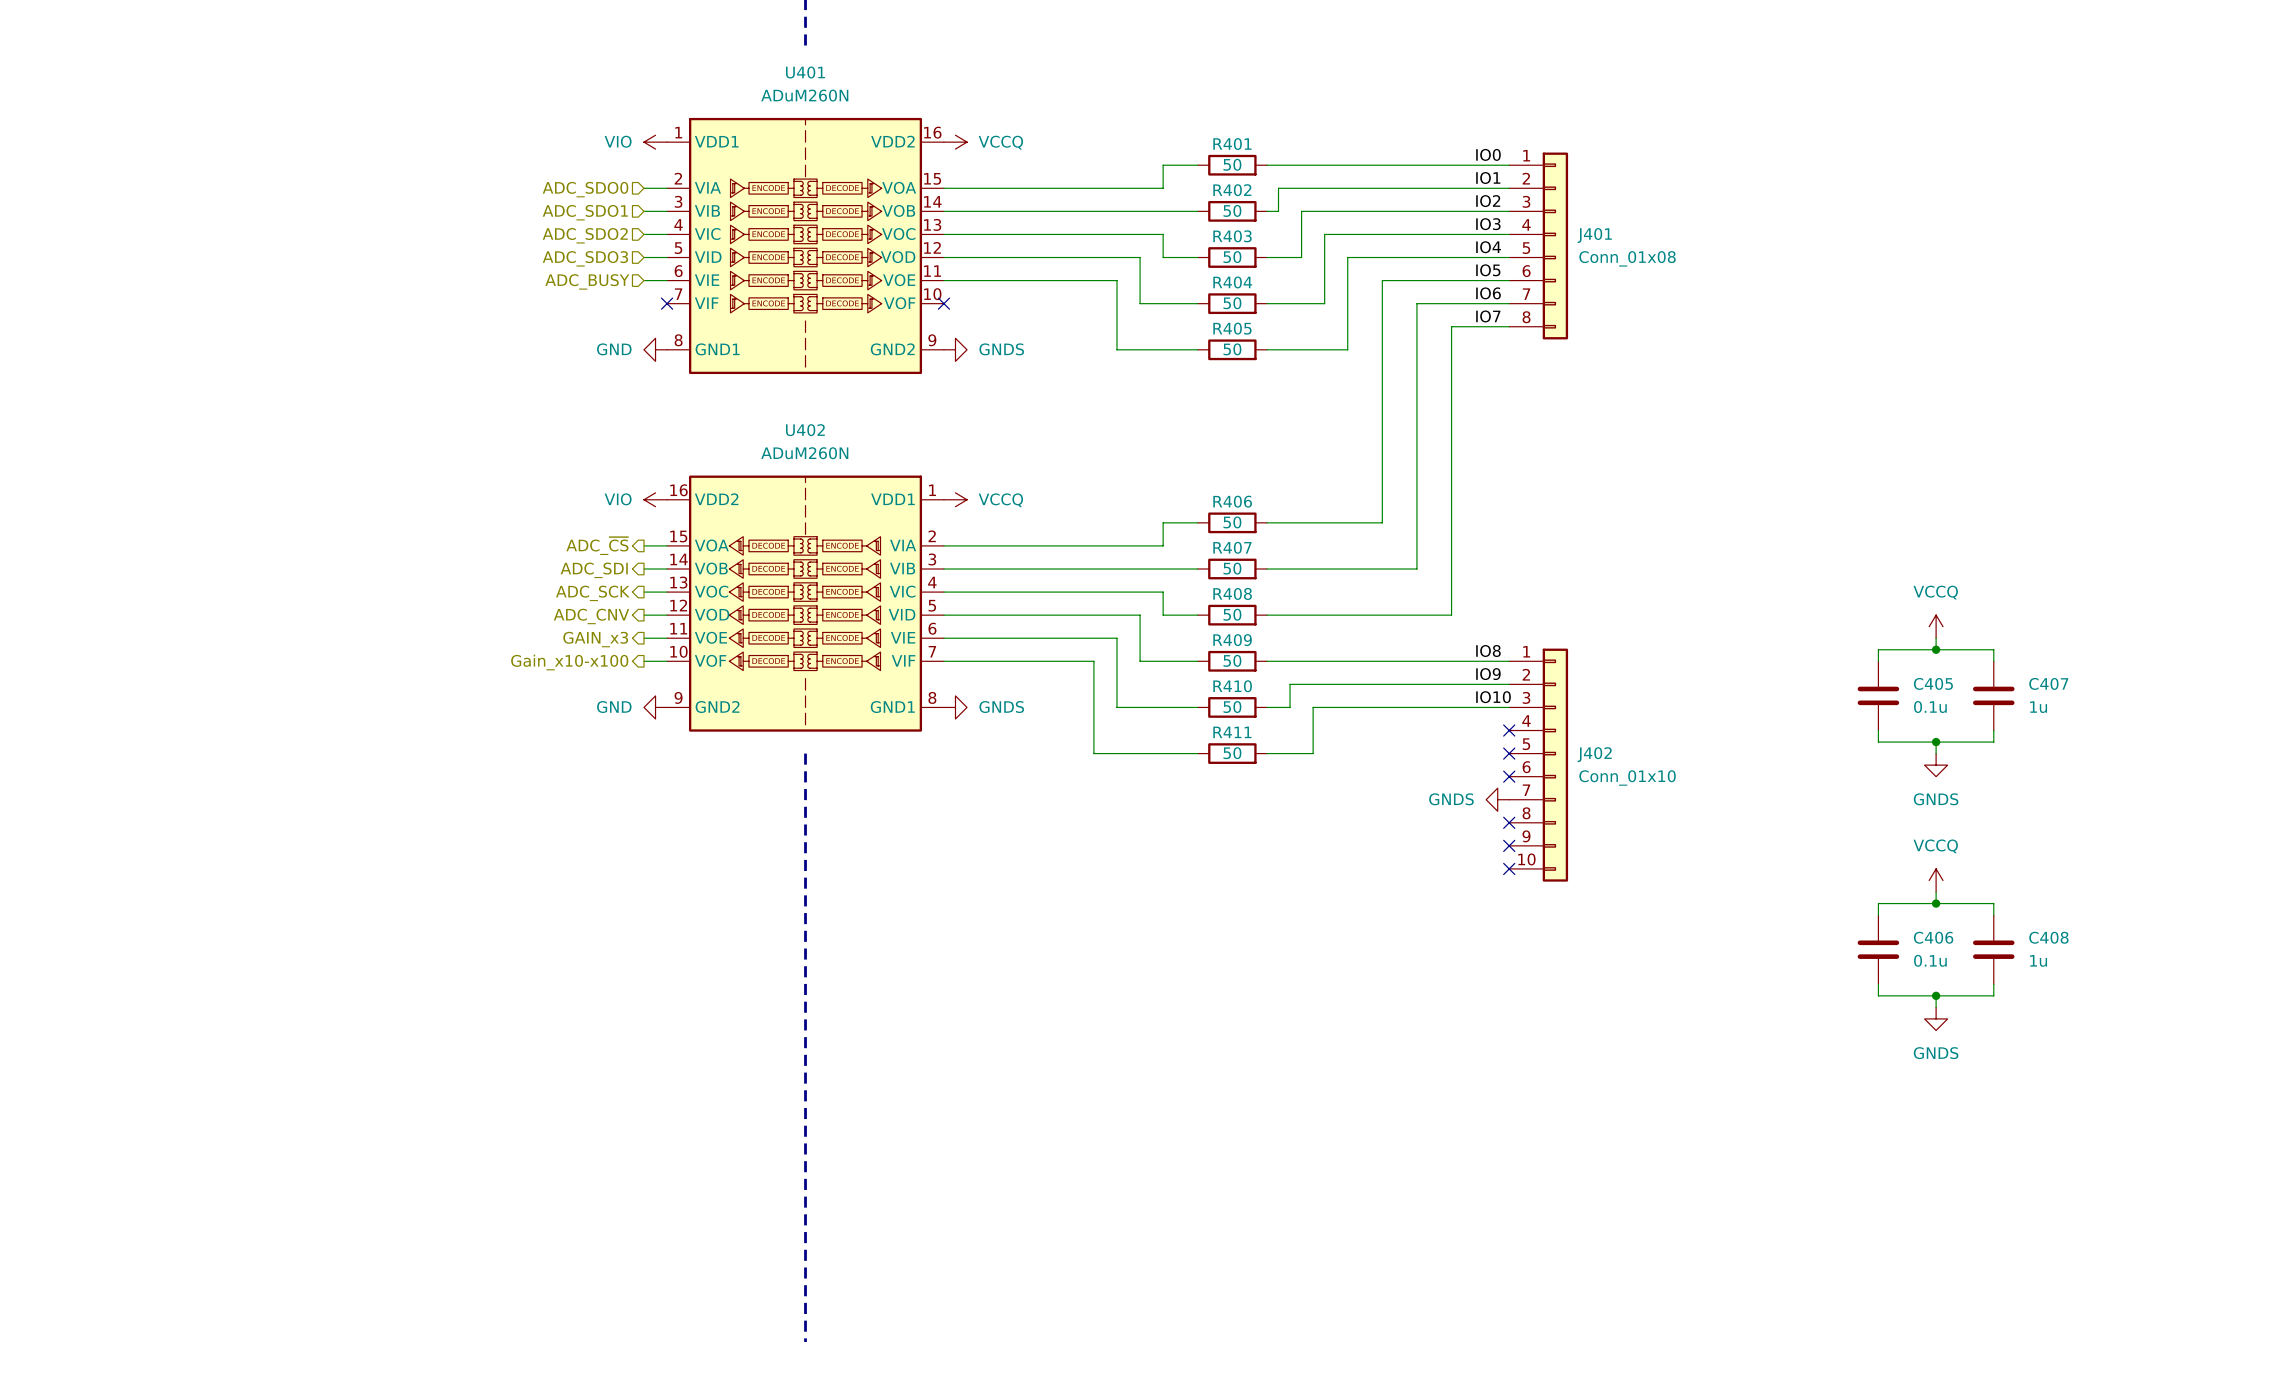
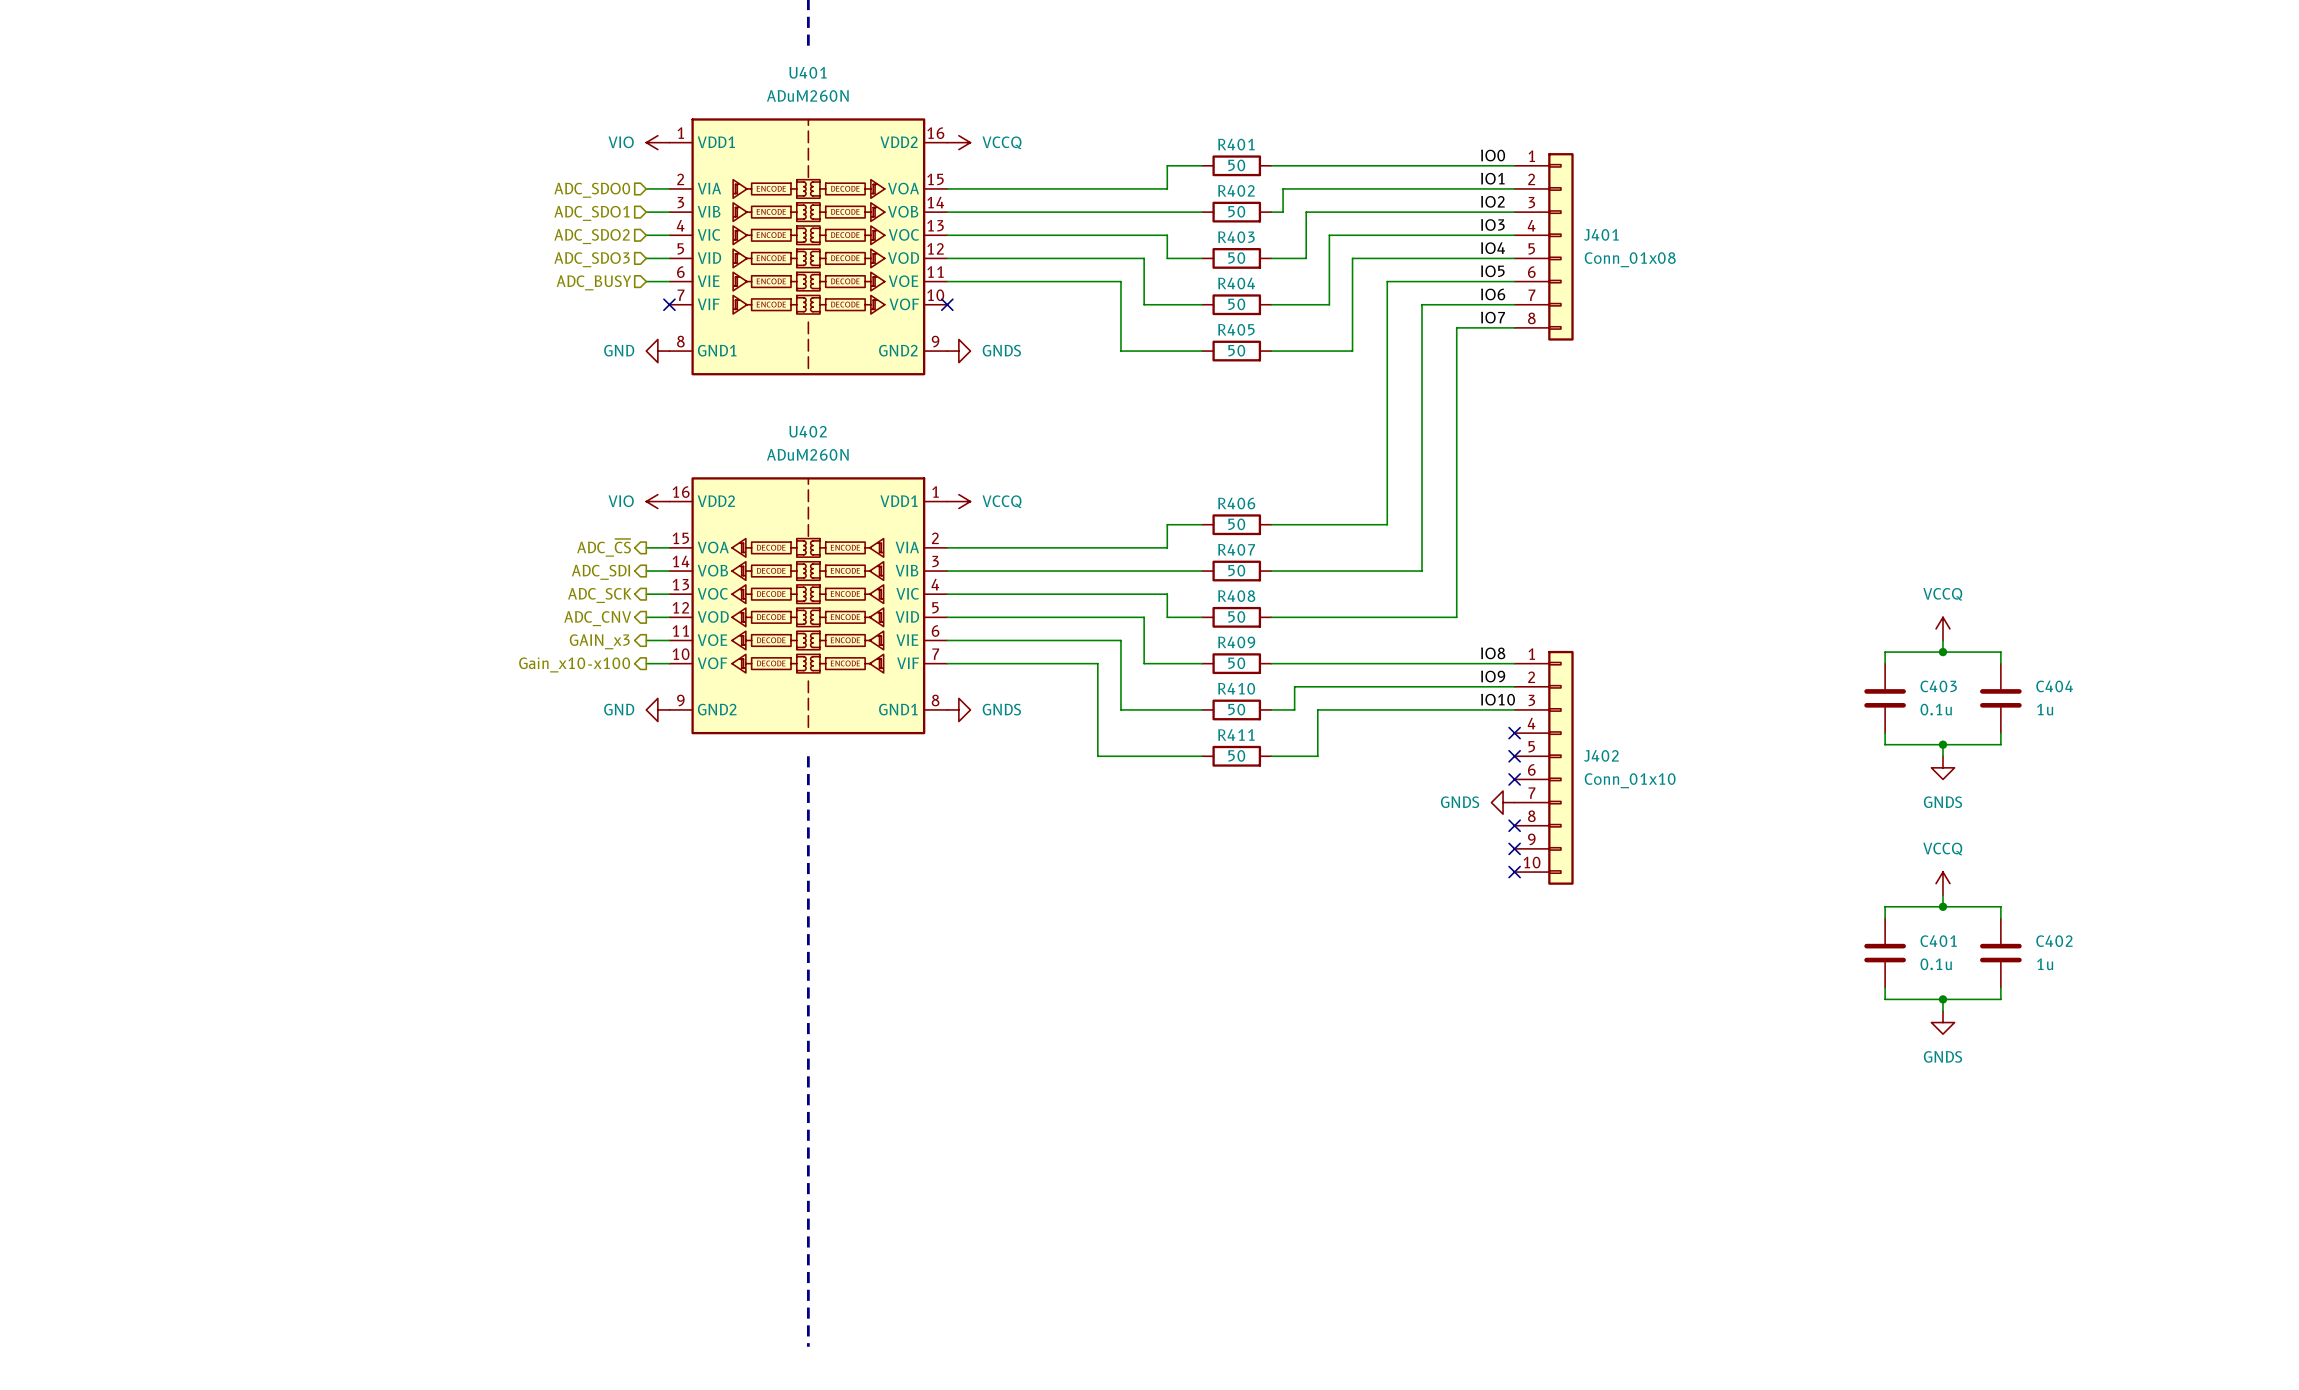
C405 name: C405 (1933, 683) -> C403 (1938, 686)
C407 name: C407 (2048, 683) -> C404 (2054, 686)
C406 name: C406 (1933, 937) -> C401 (1938, 941)
C408 name: C408 (2048, 937) -> C402 (2054, 941)

